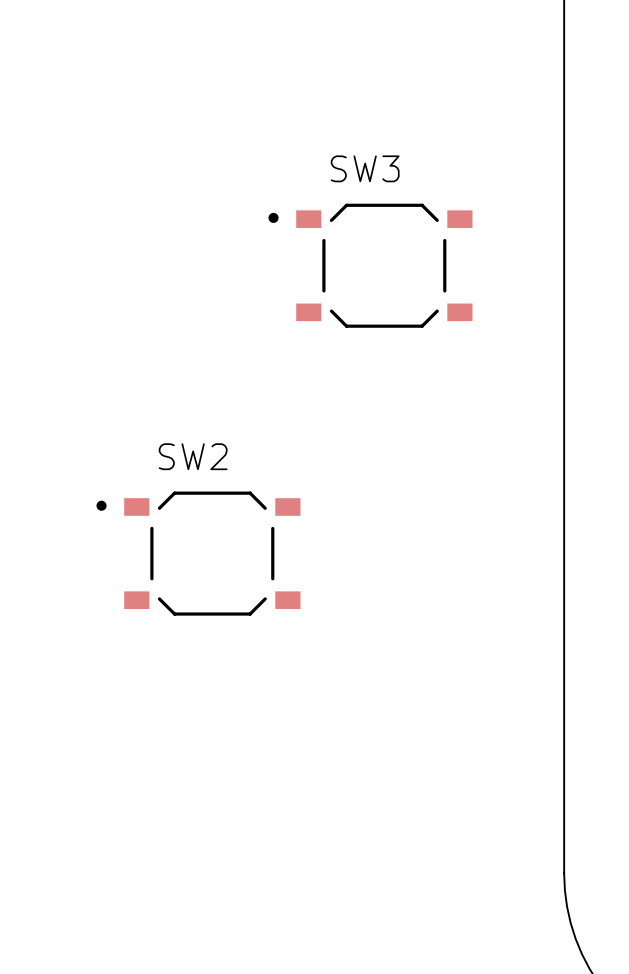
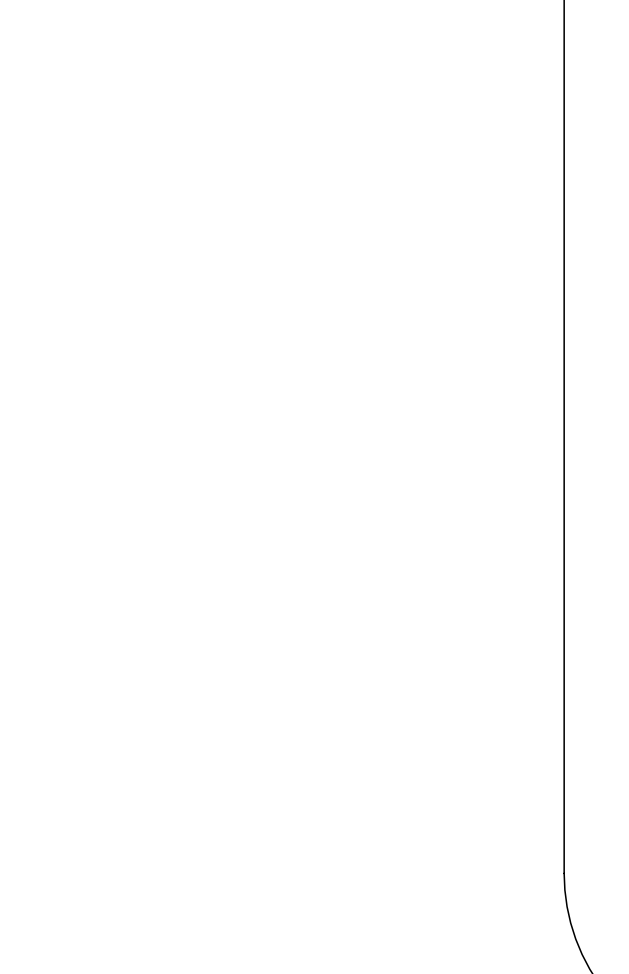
SW3: (370, 265) -> none
SW2: (198, 553) -> none

